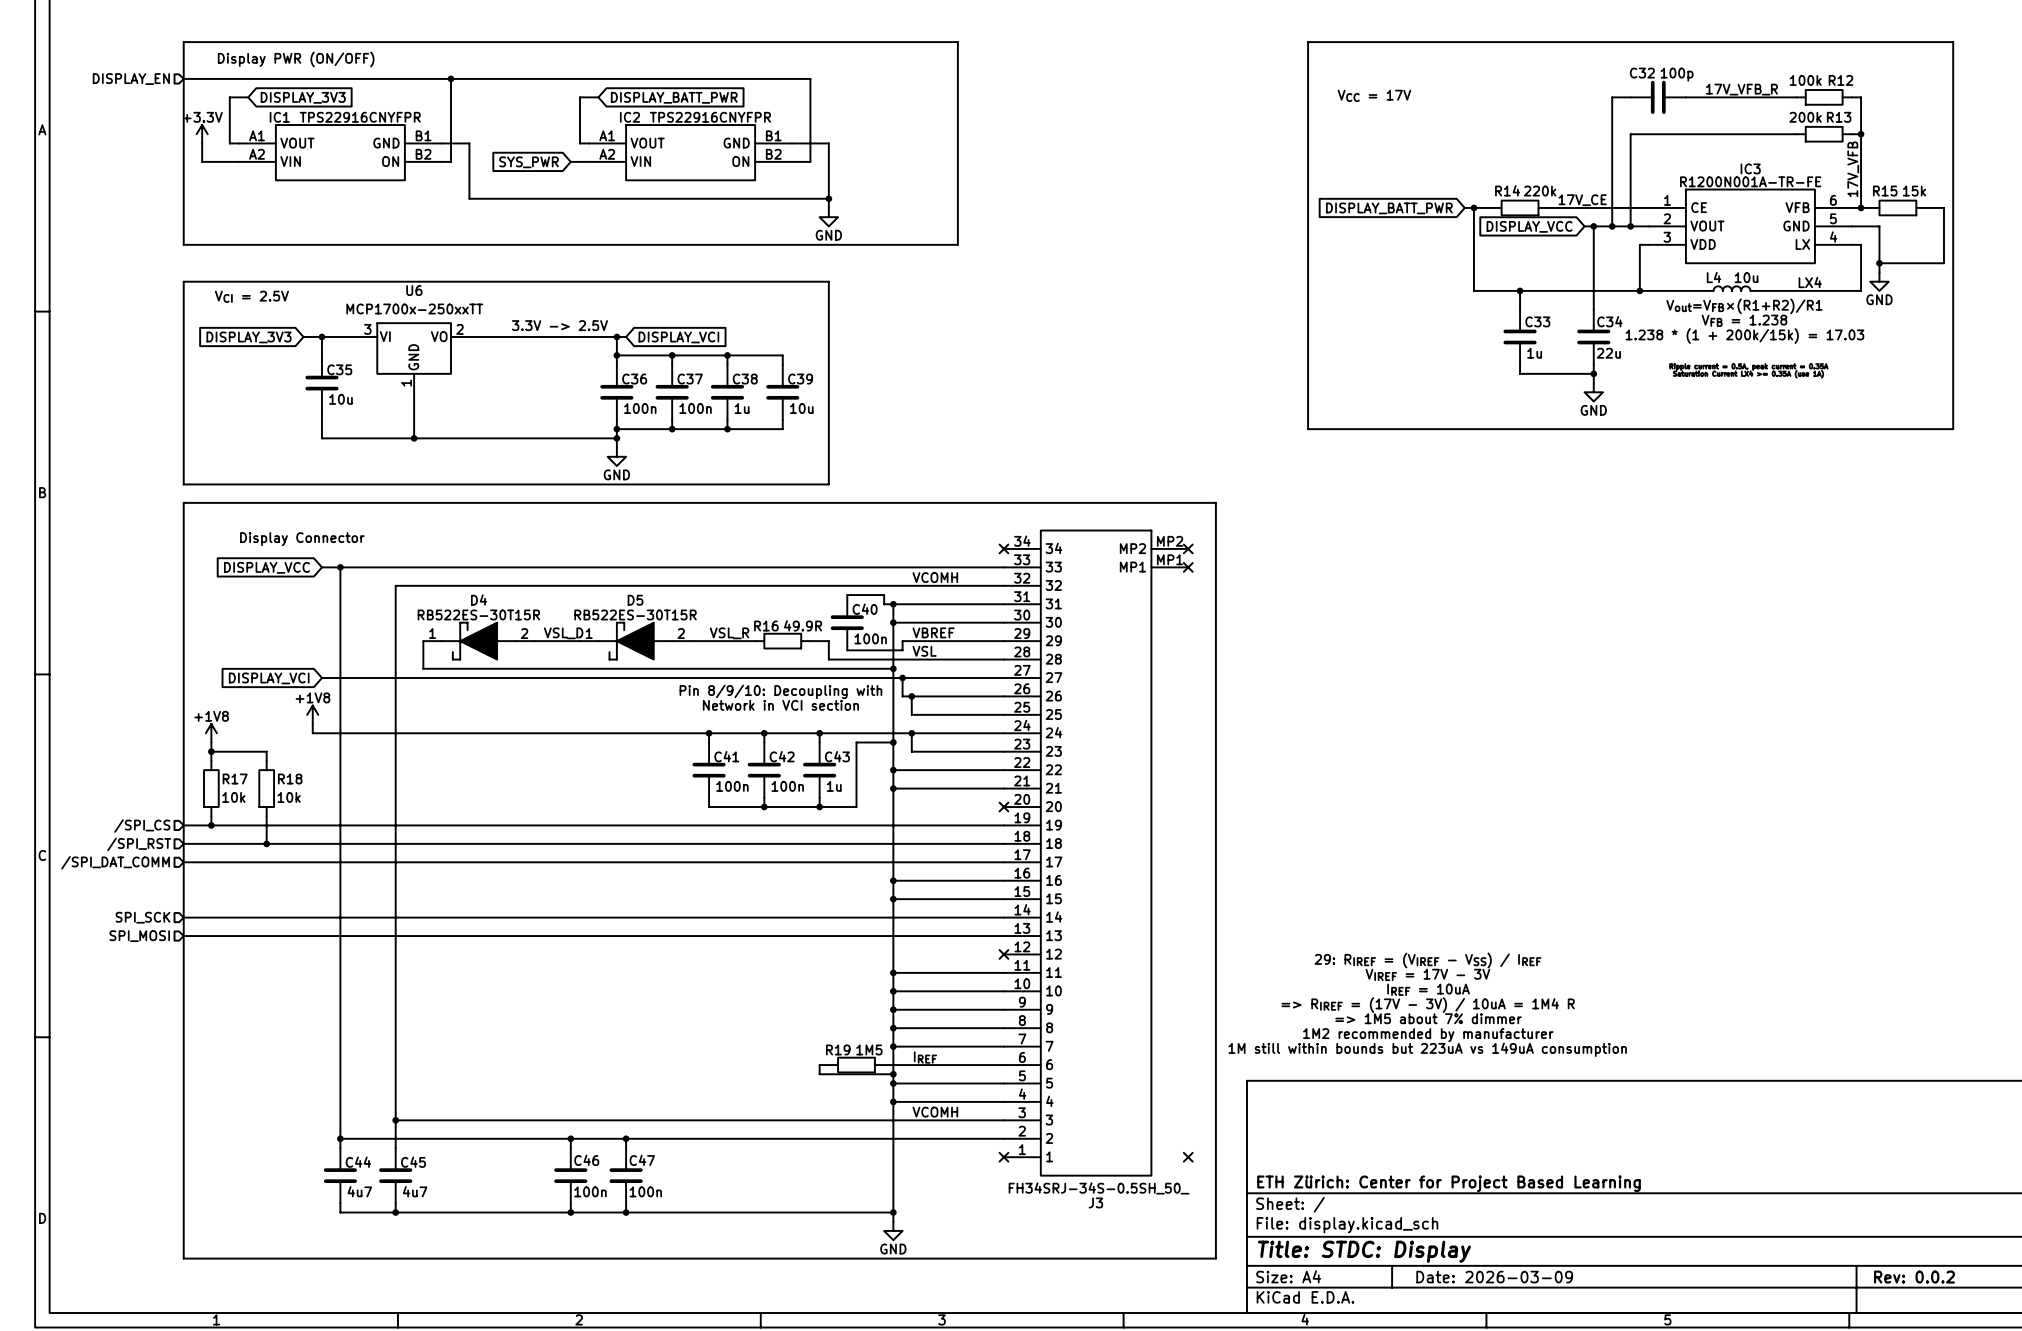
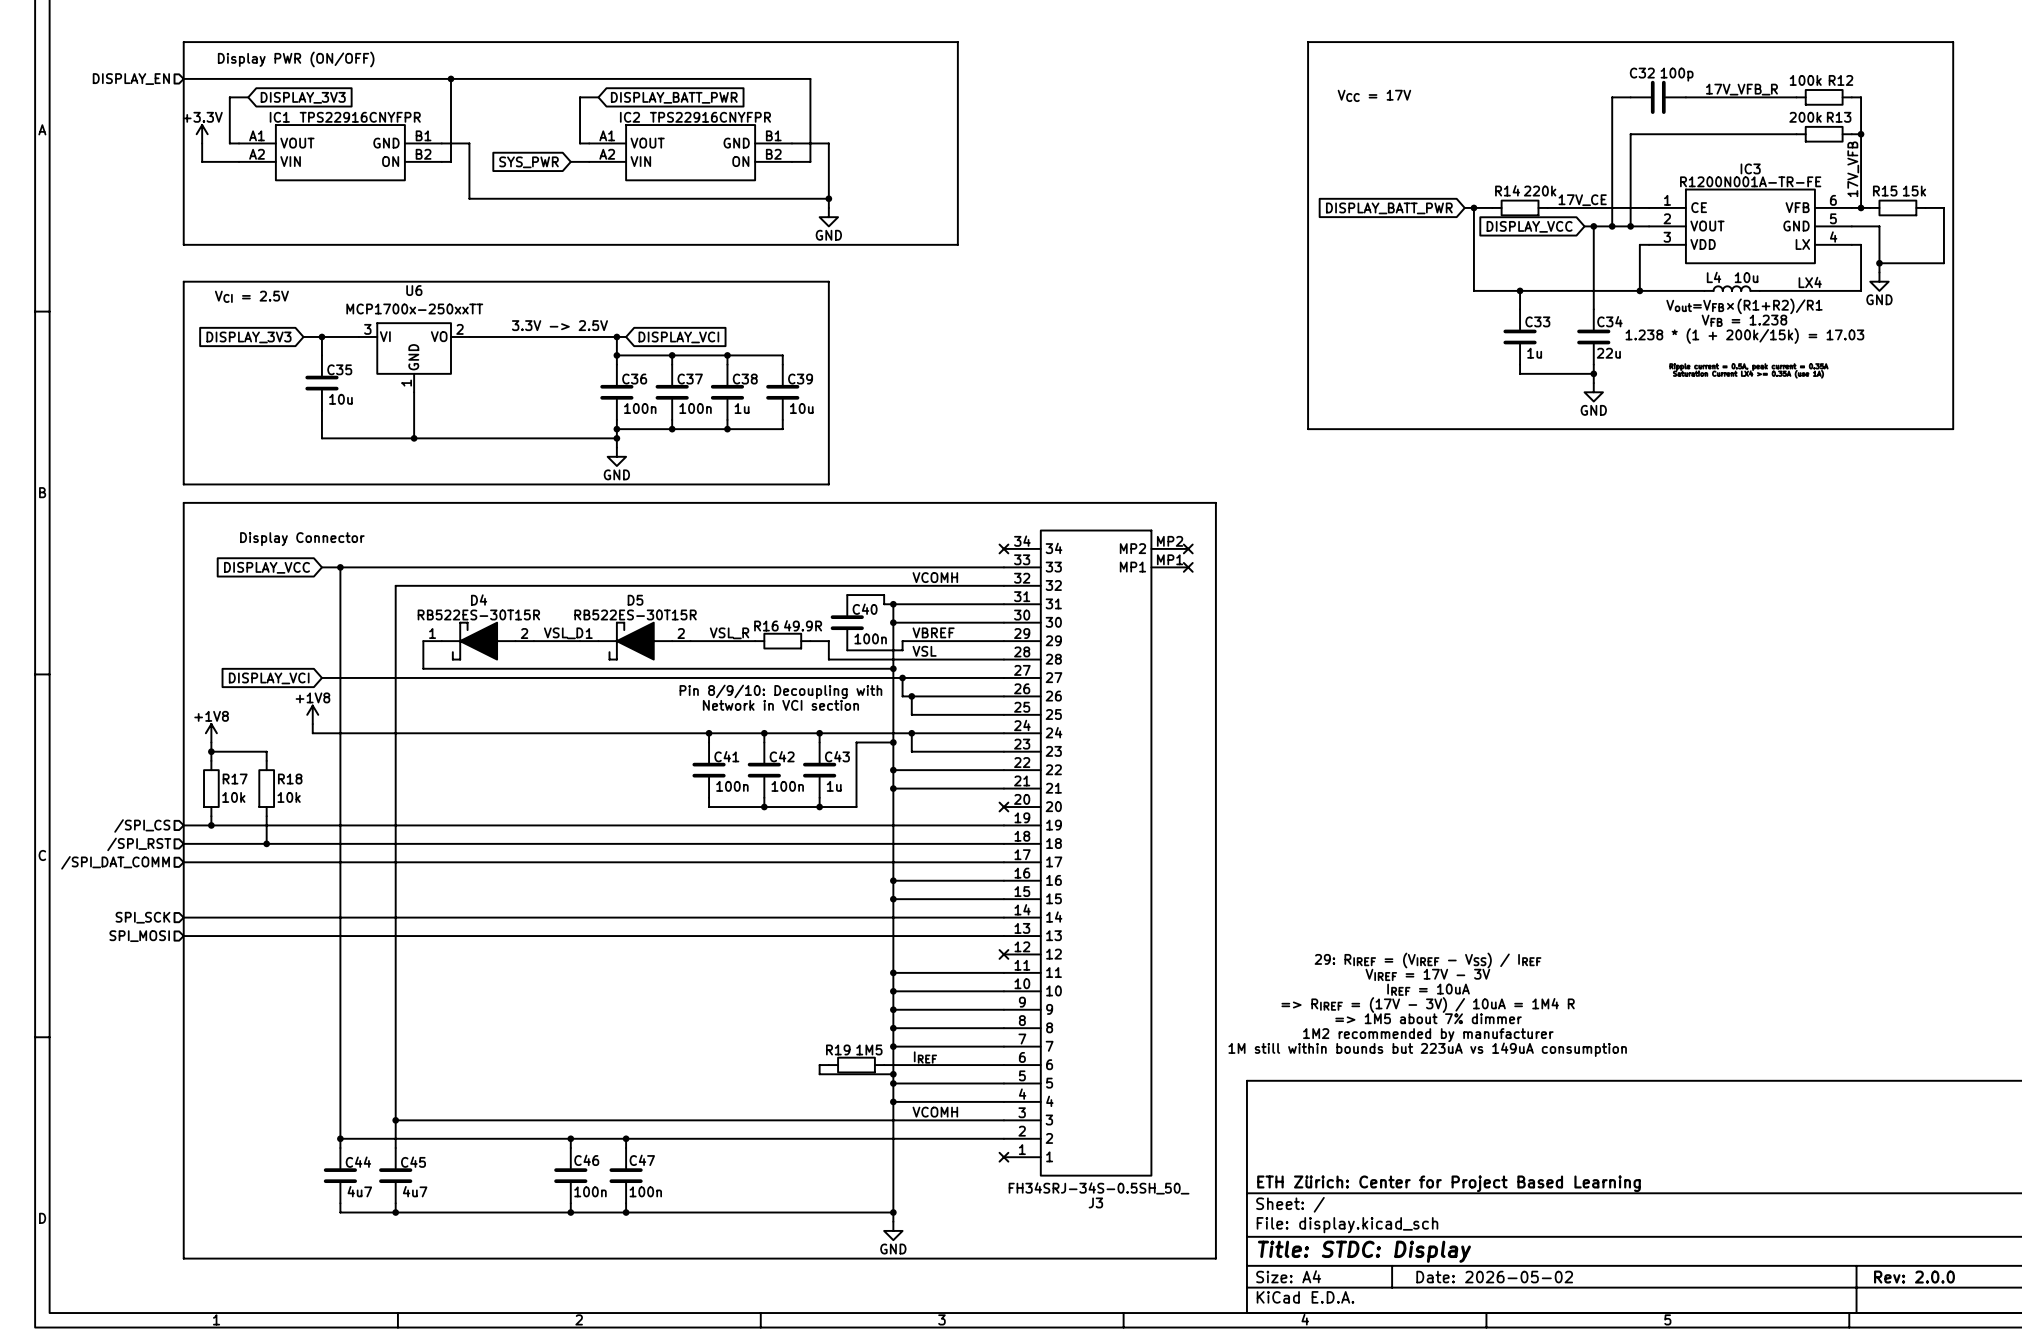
no-connect mark: (1188, 1157) -> none
title block: Date: 2026-03-09 (1494, 1277) -> Date: 2026-05-02 (1494, 1277)
title block: Rev: 0.0.2 (1914, 1277) -> Rev: 2.0.0 (1914, 1277)

